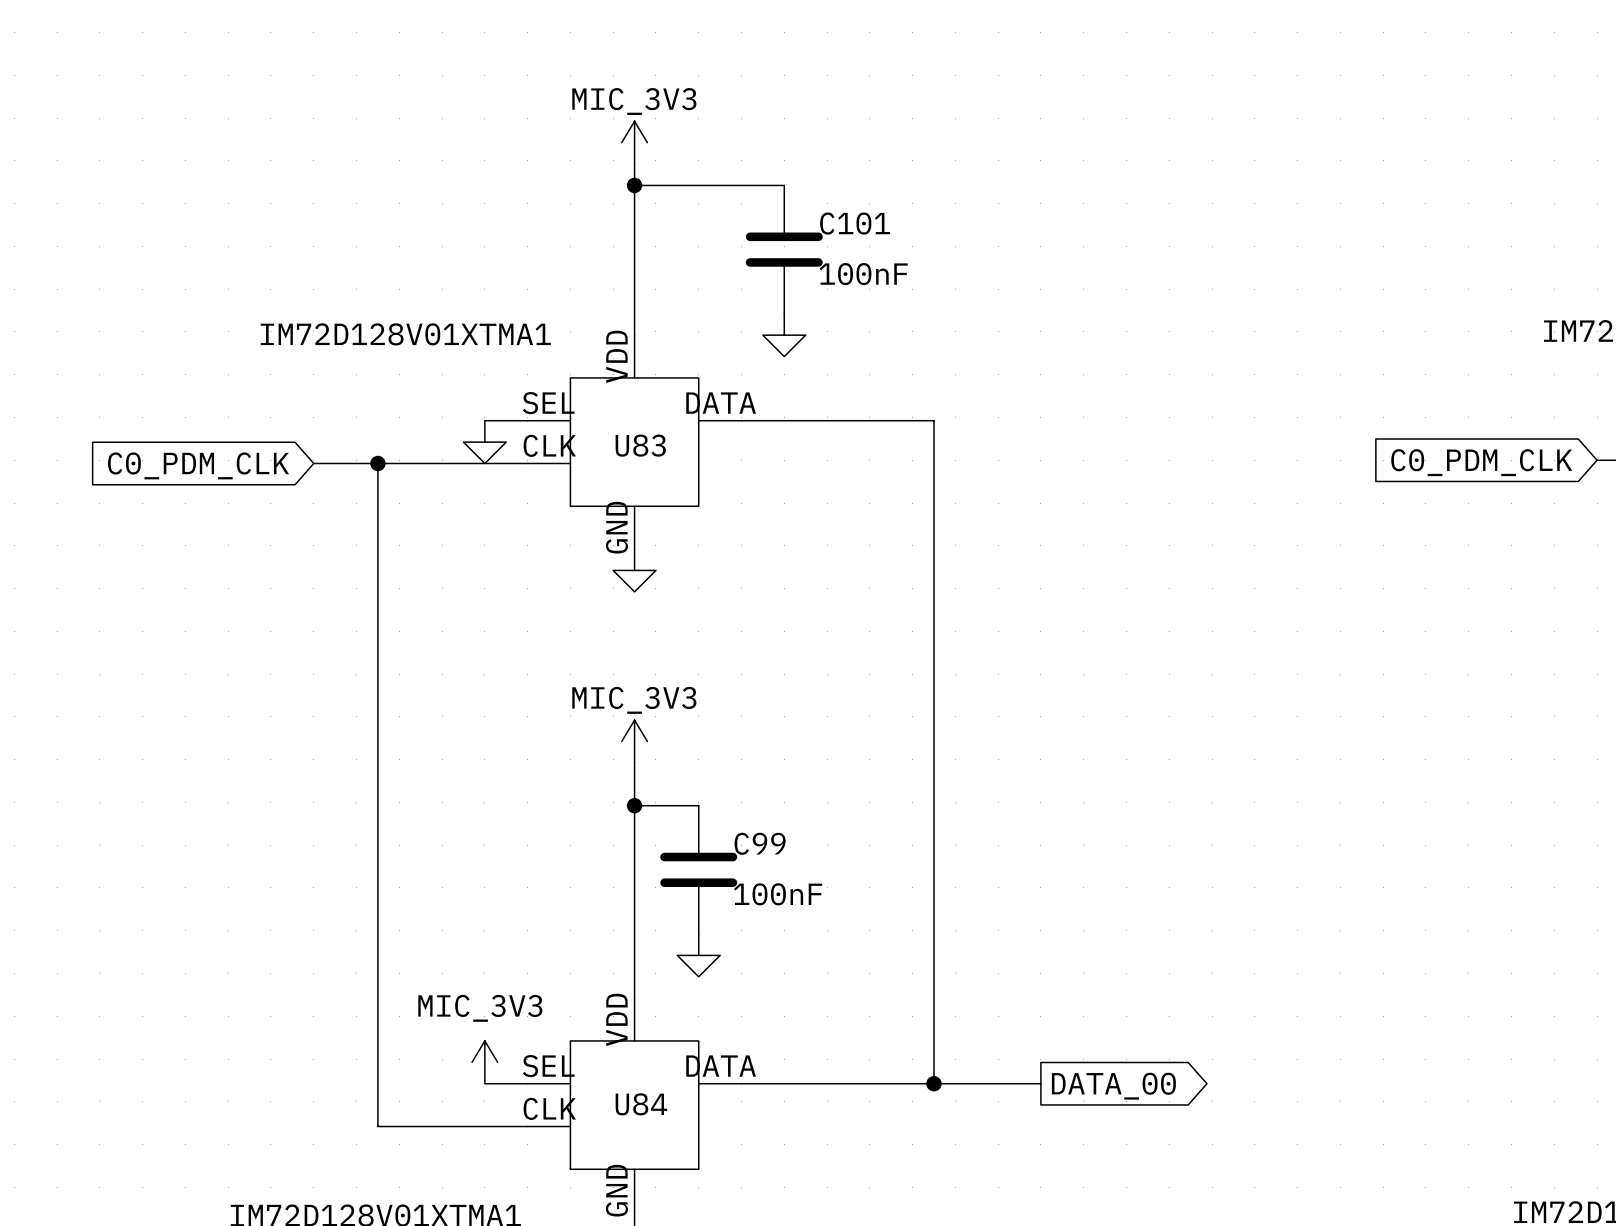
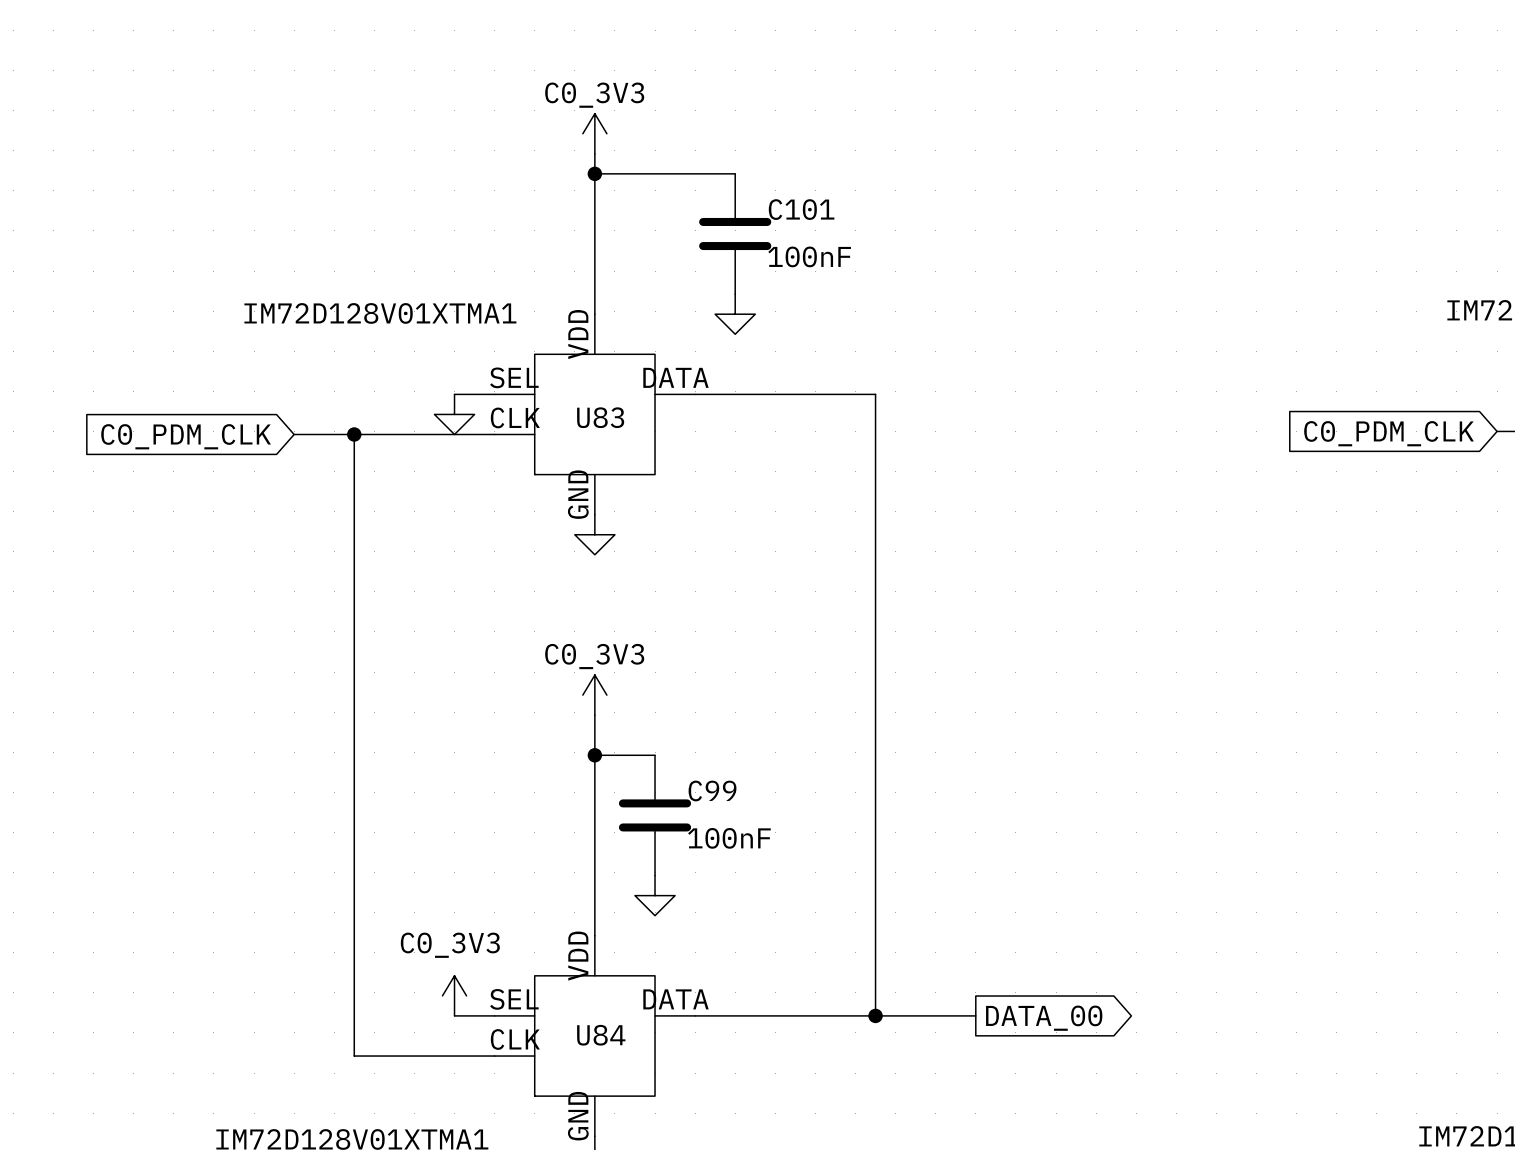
power symbol: MIC_3V3 (634, 142) -> C0_3V3 (594, 133)
power symbol: MIC_3V3 (634, 741) -> C0_3V3 (594, 695)
power symbol: MIC_3V3 (484, 1062) -> C0_3V3 (454, 995)

